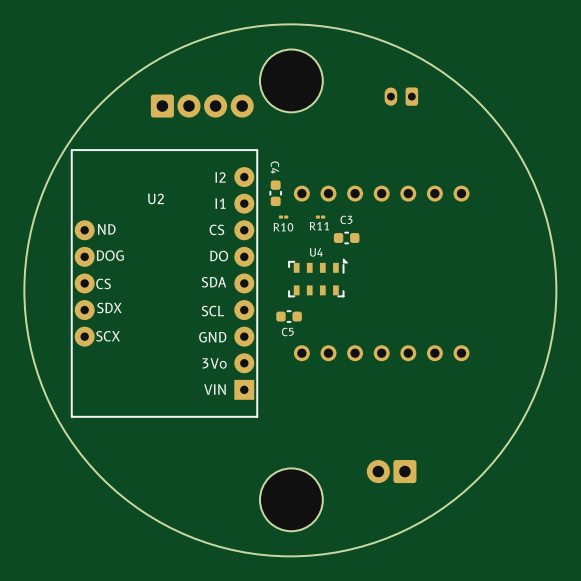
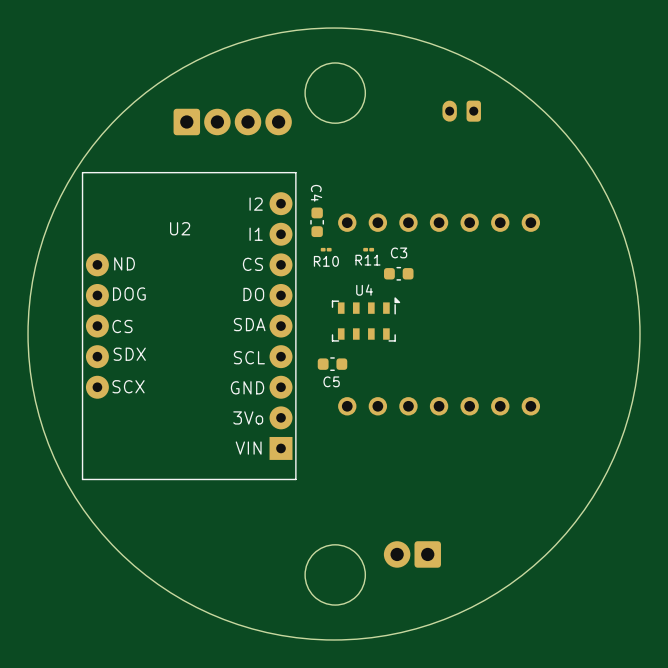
round board edge: none -> [304, 62, 366, 124]
part: (291, 80) -> none
part position: (391, 471) -> (412, 554)
round board edge: none -> [304, 544, 366, 606]
part: (291, 499) -> none

